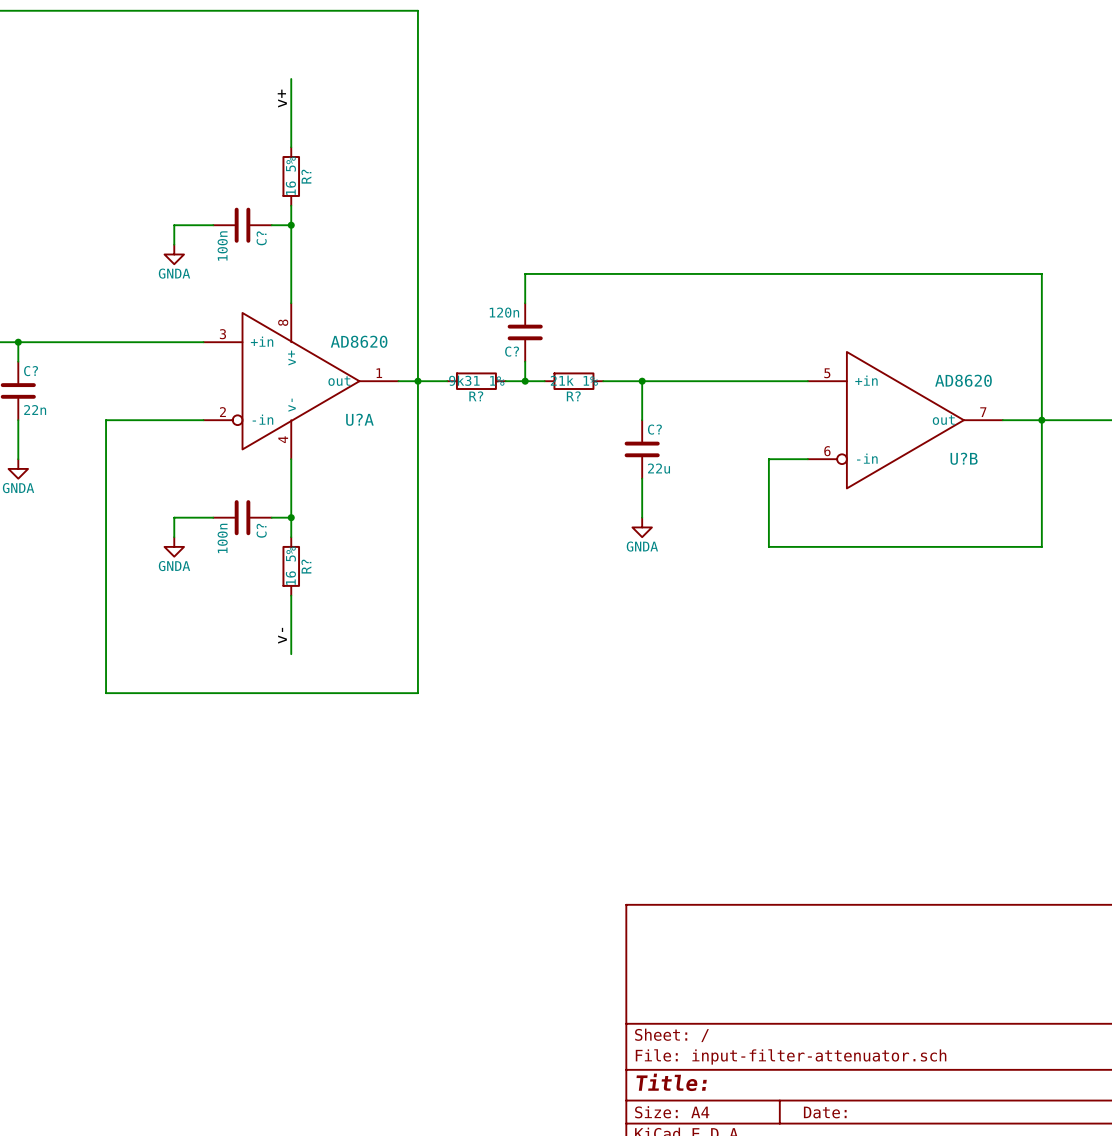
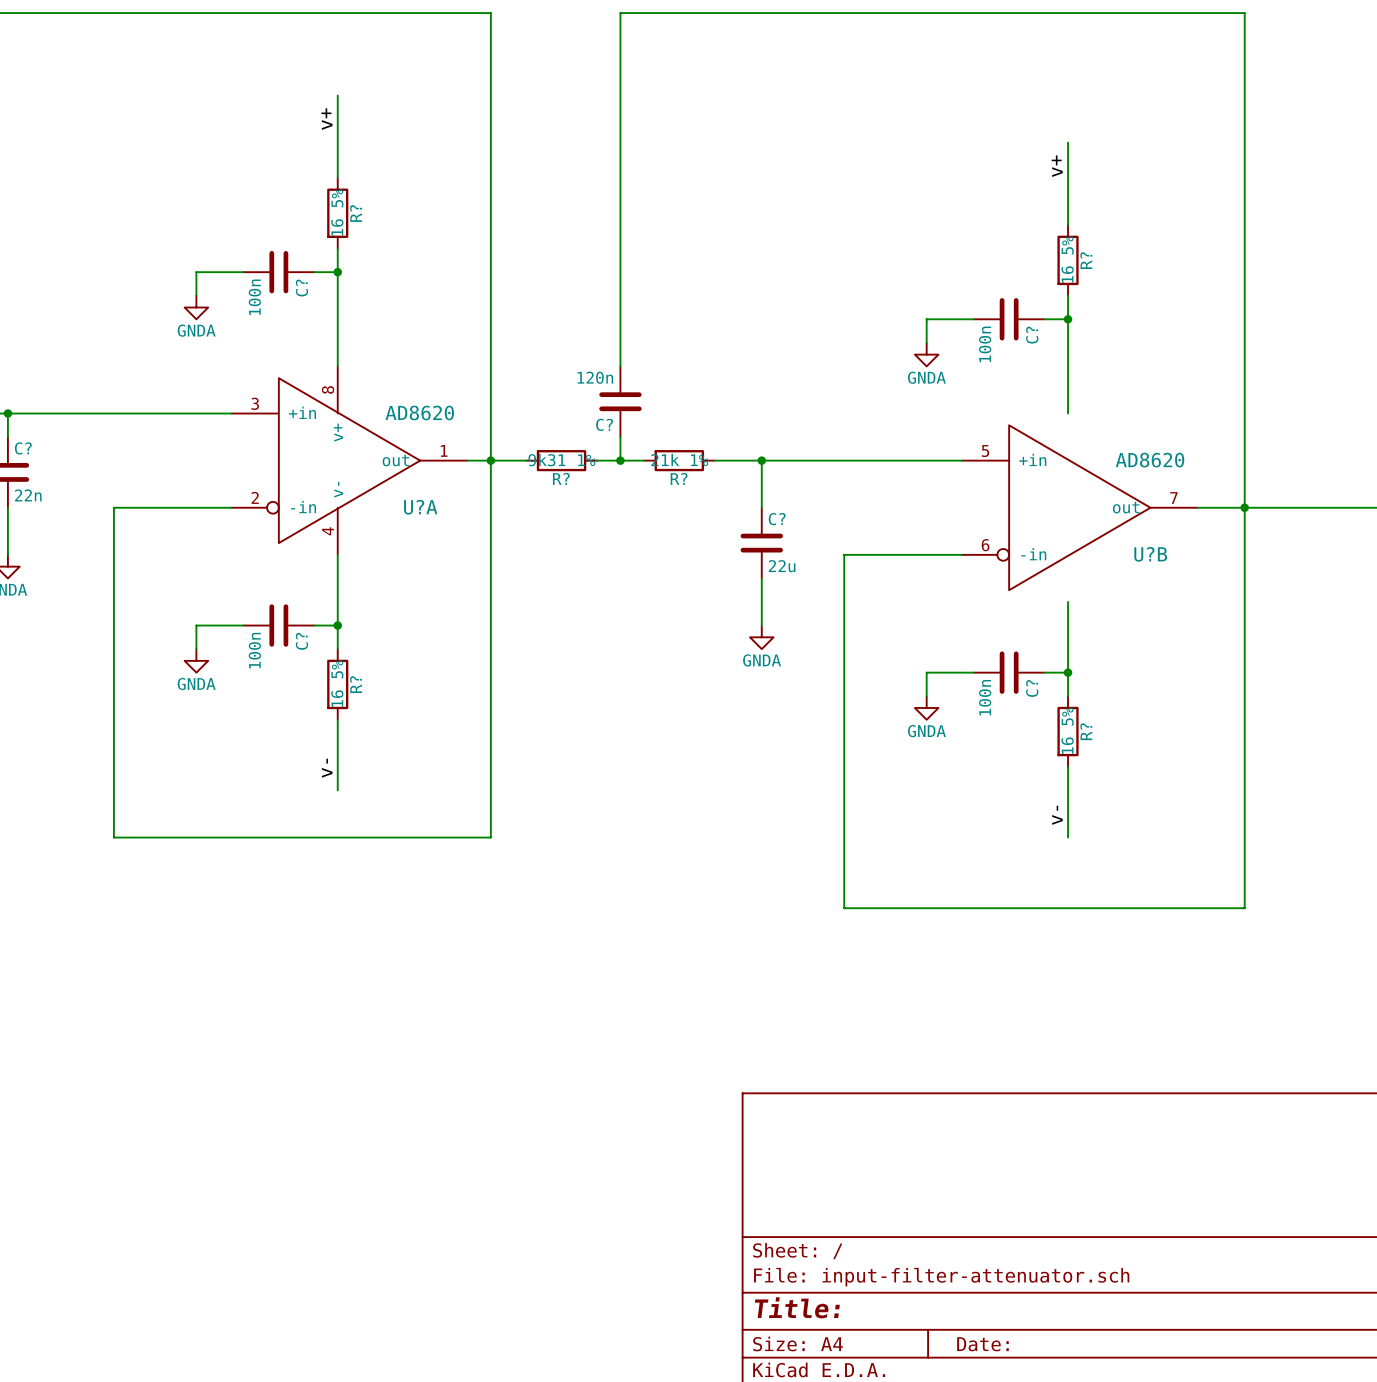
wire: none -> (1068, 142) (1068, 225)
label: none -> v+ (1057, 166)
R?: none -> 16 5% (1068, 260)
wire: none -> (1068, 295) (1068, 413)
wire: none -> (973, 319) (926, 319) (926, 342)
C?: none -> 100n (1009, 319)
wire: none -> (1044, 319) (1068, 319)
junction: none -> (1068, 319)
wire: (525, 273) (1041, 273) -> (620, 331) (620, 13) (1244, 13) (1244, 331)
power symbol: none -> GNDA (926, 354)
wire: (768, 459) (768, 546) (1041, 546) -> (914, 554) (844, 554) (844, 908) (1244, 908) (1244, 660)
wire: none -> (1068, 601) (1068, 696)
wire: none -> (973, 672) (926, 672) (926, 696)
C?: none -> 100n (1009, 672)
wire: none -> (1044, 672) (1068, 672)
junction: none -> (1068, 672)
power symbol: none -> GNDA (926, 707)
R?: none -> 16 5% (1068, 731)
wire: none -> (1068, 766) (1068, 837)
label: none -> v- (1057, 815)

